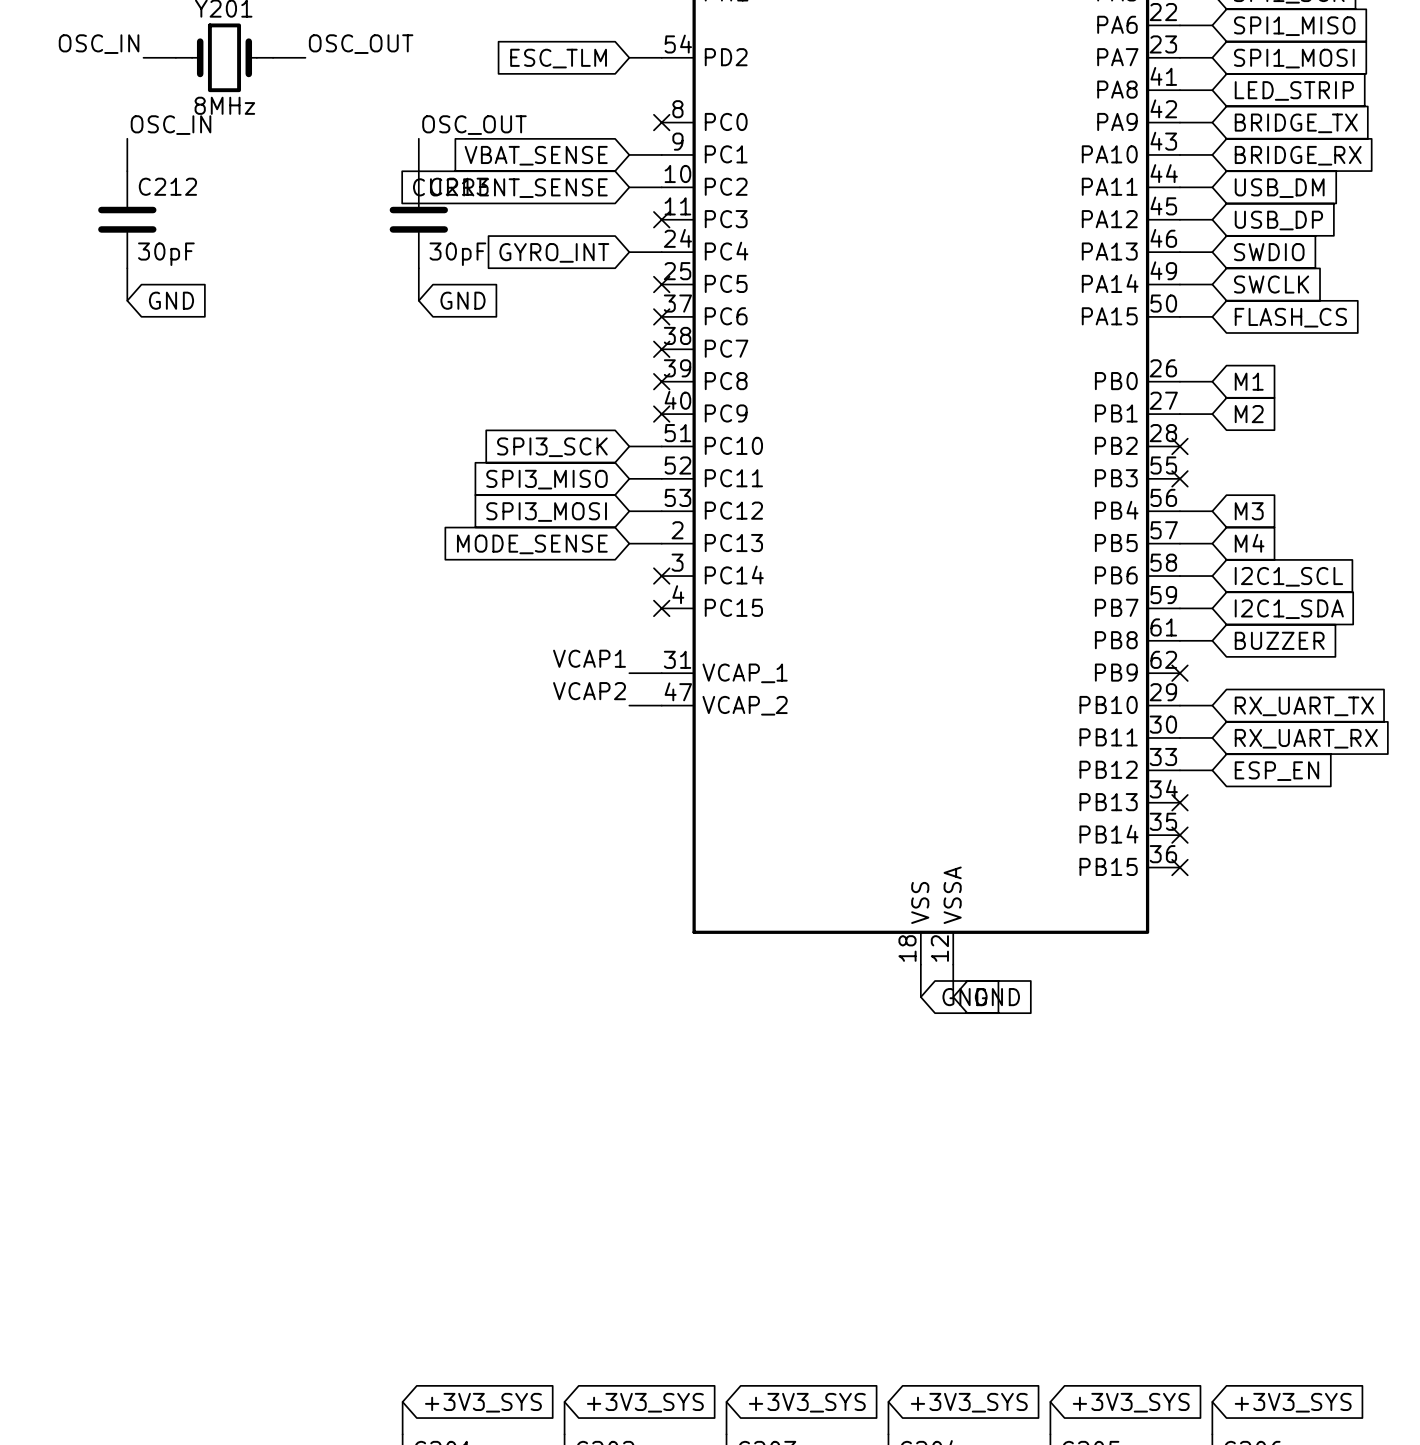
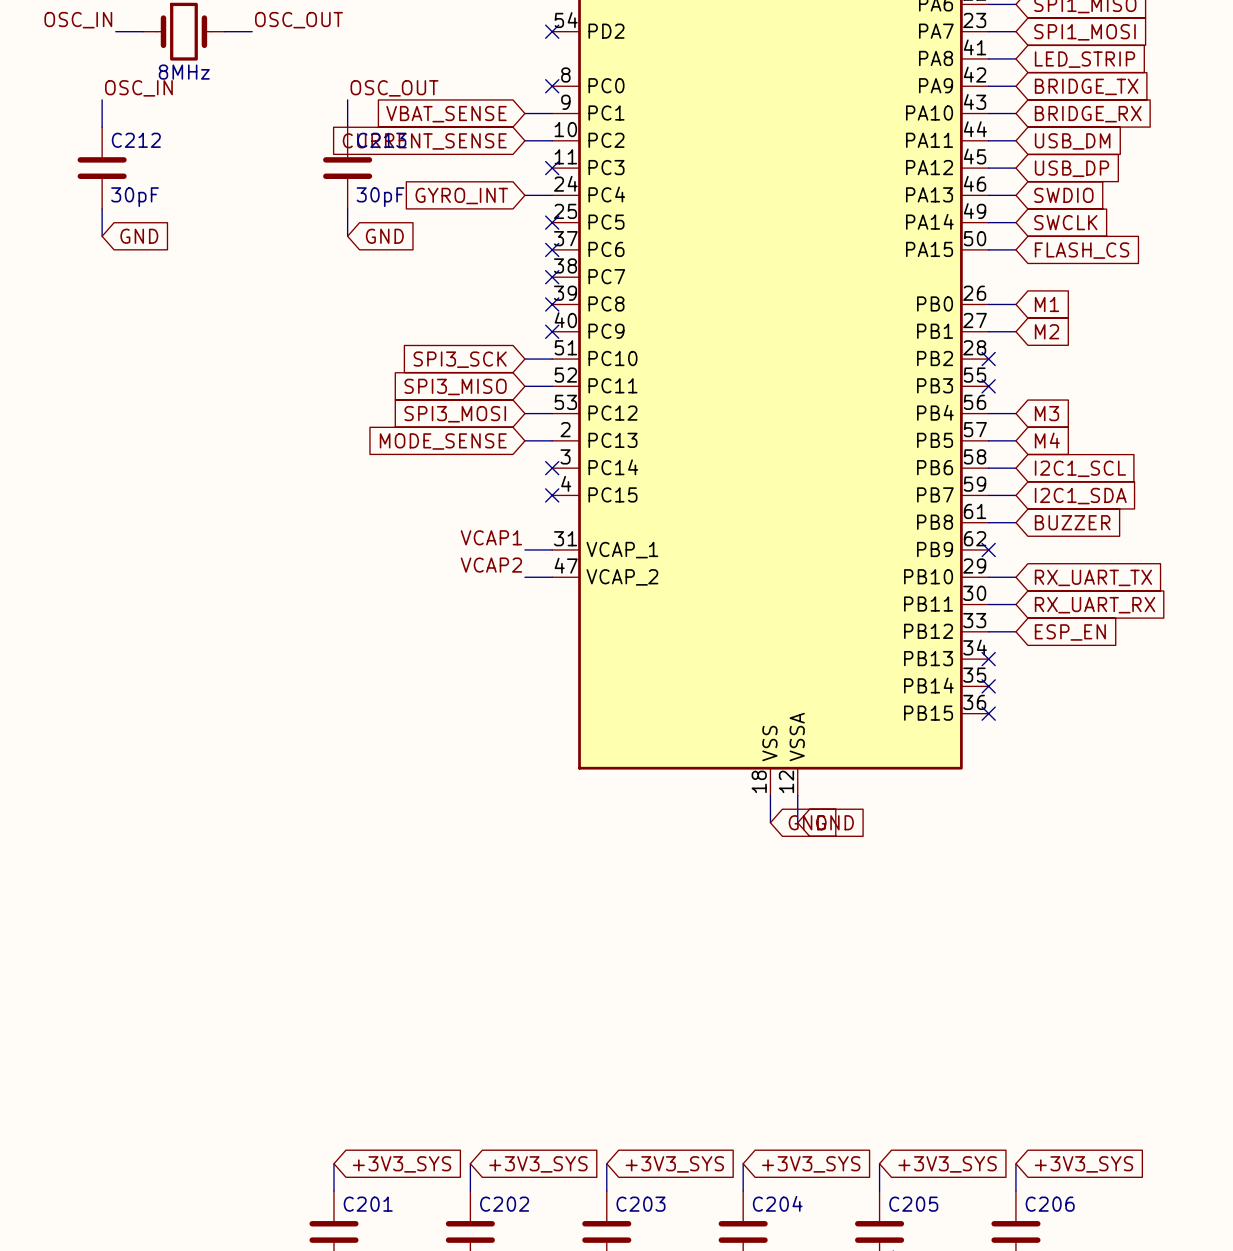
wire: (629, 57) (661, 57) -> none
no-connect mark: none -> (552, 31)
global label: ESC_TLM (558, 58) -> none

